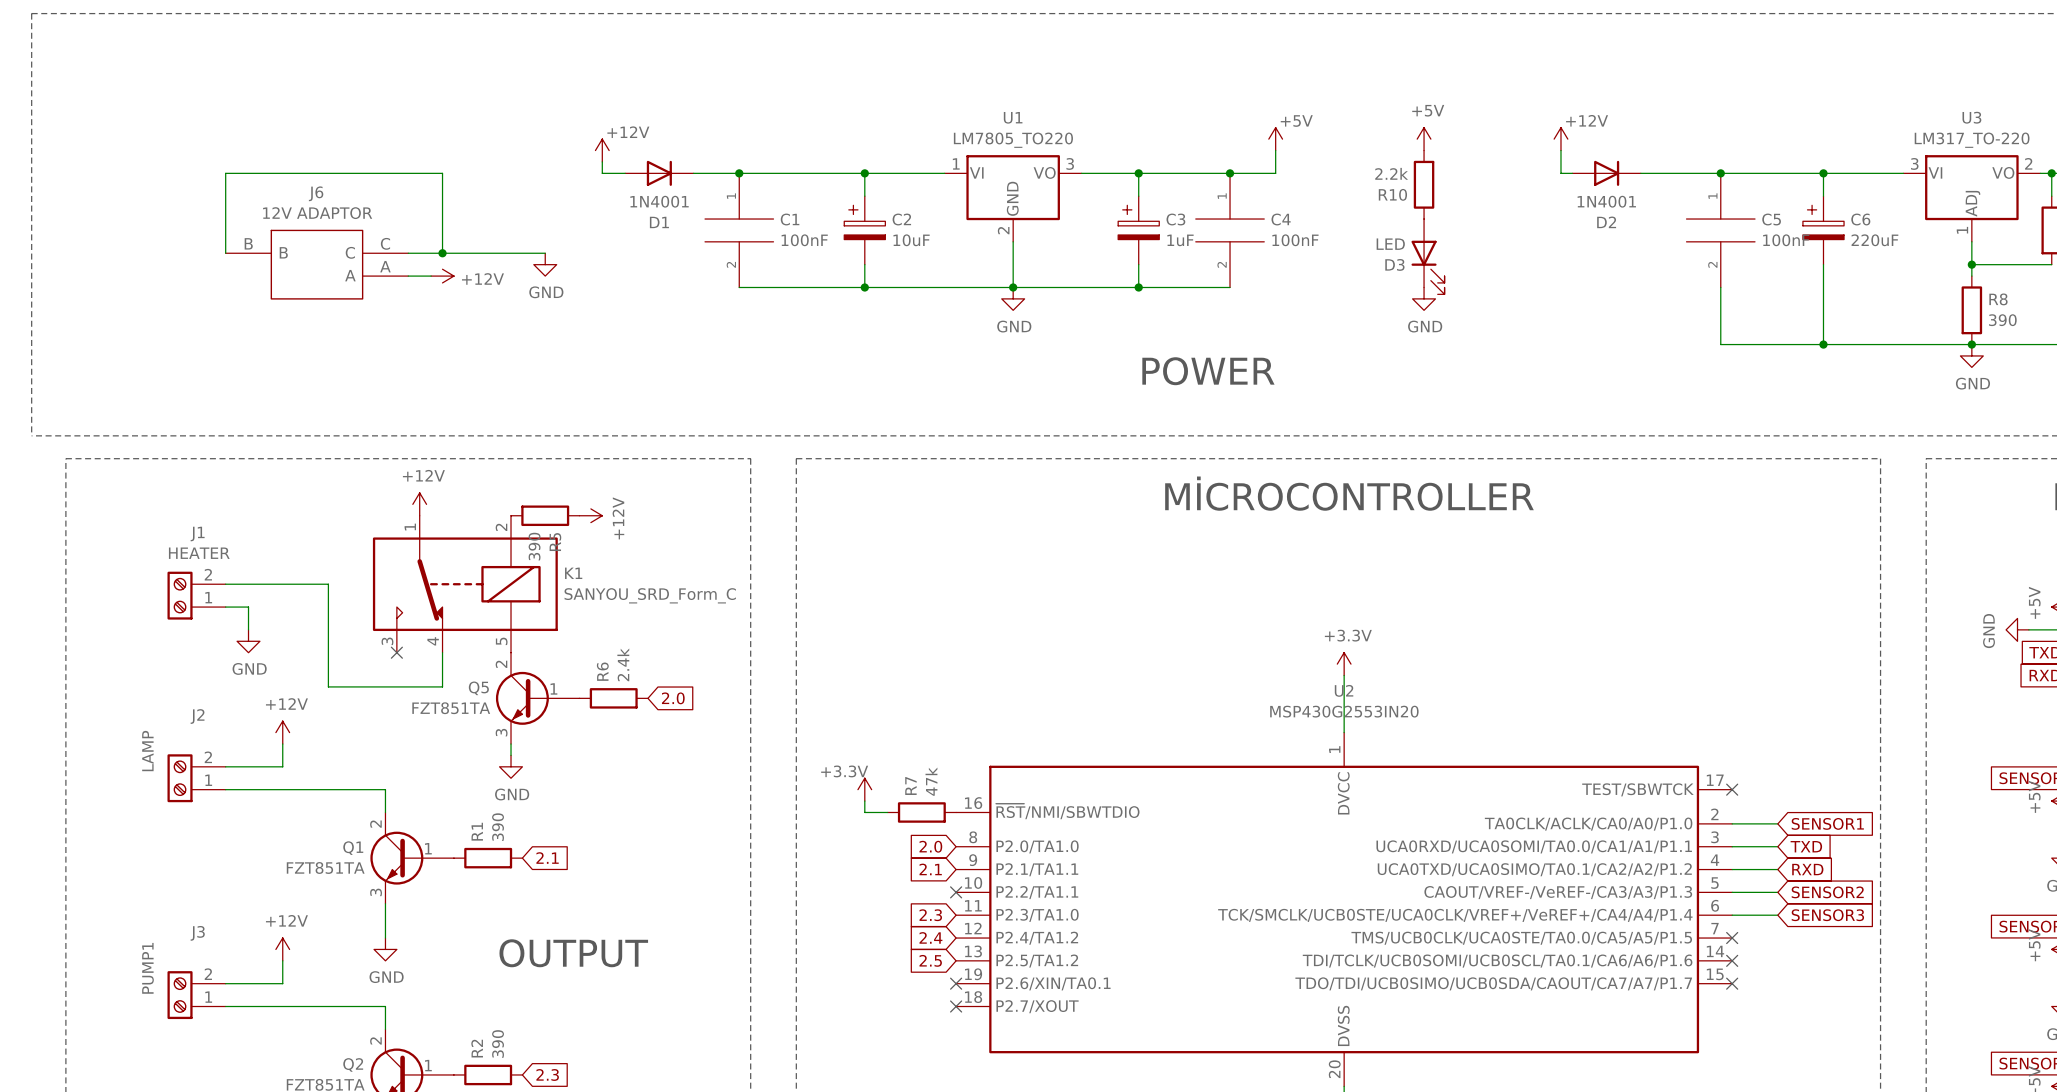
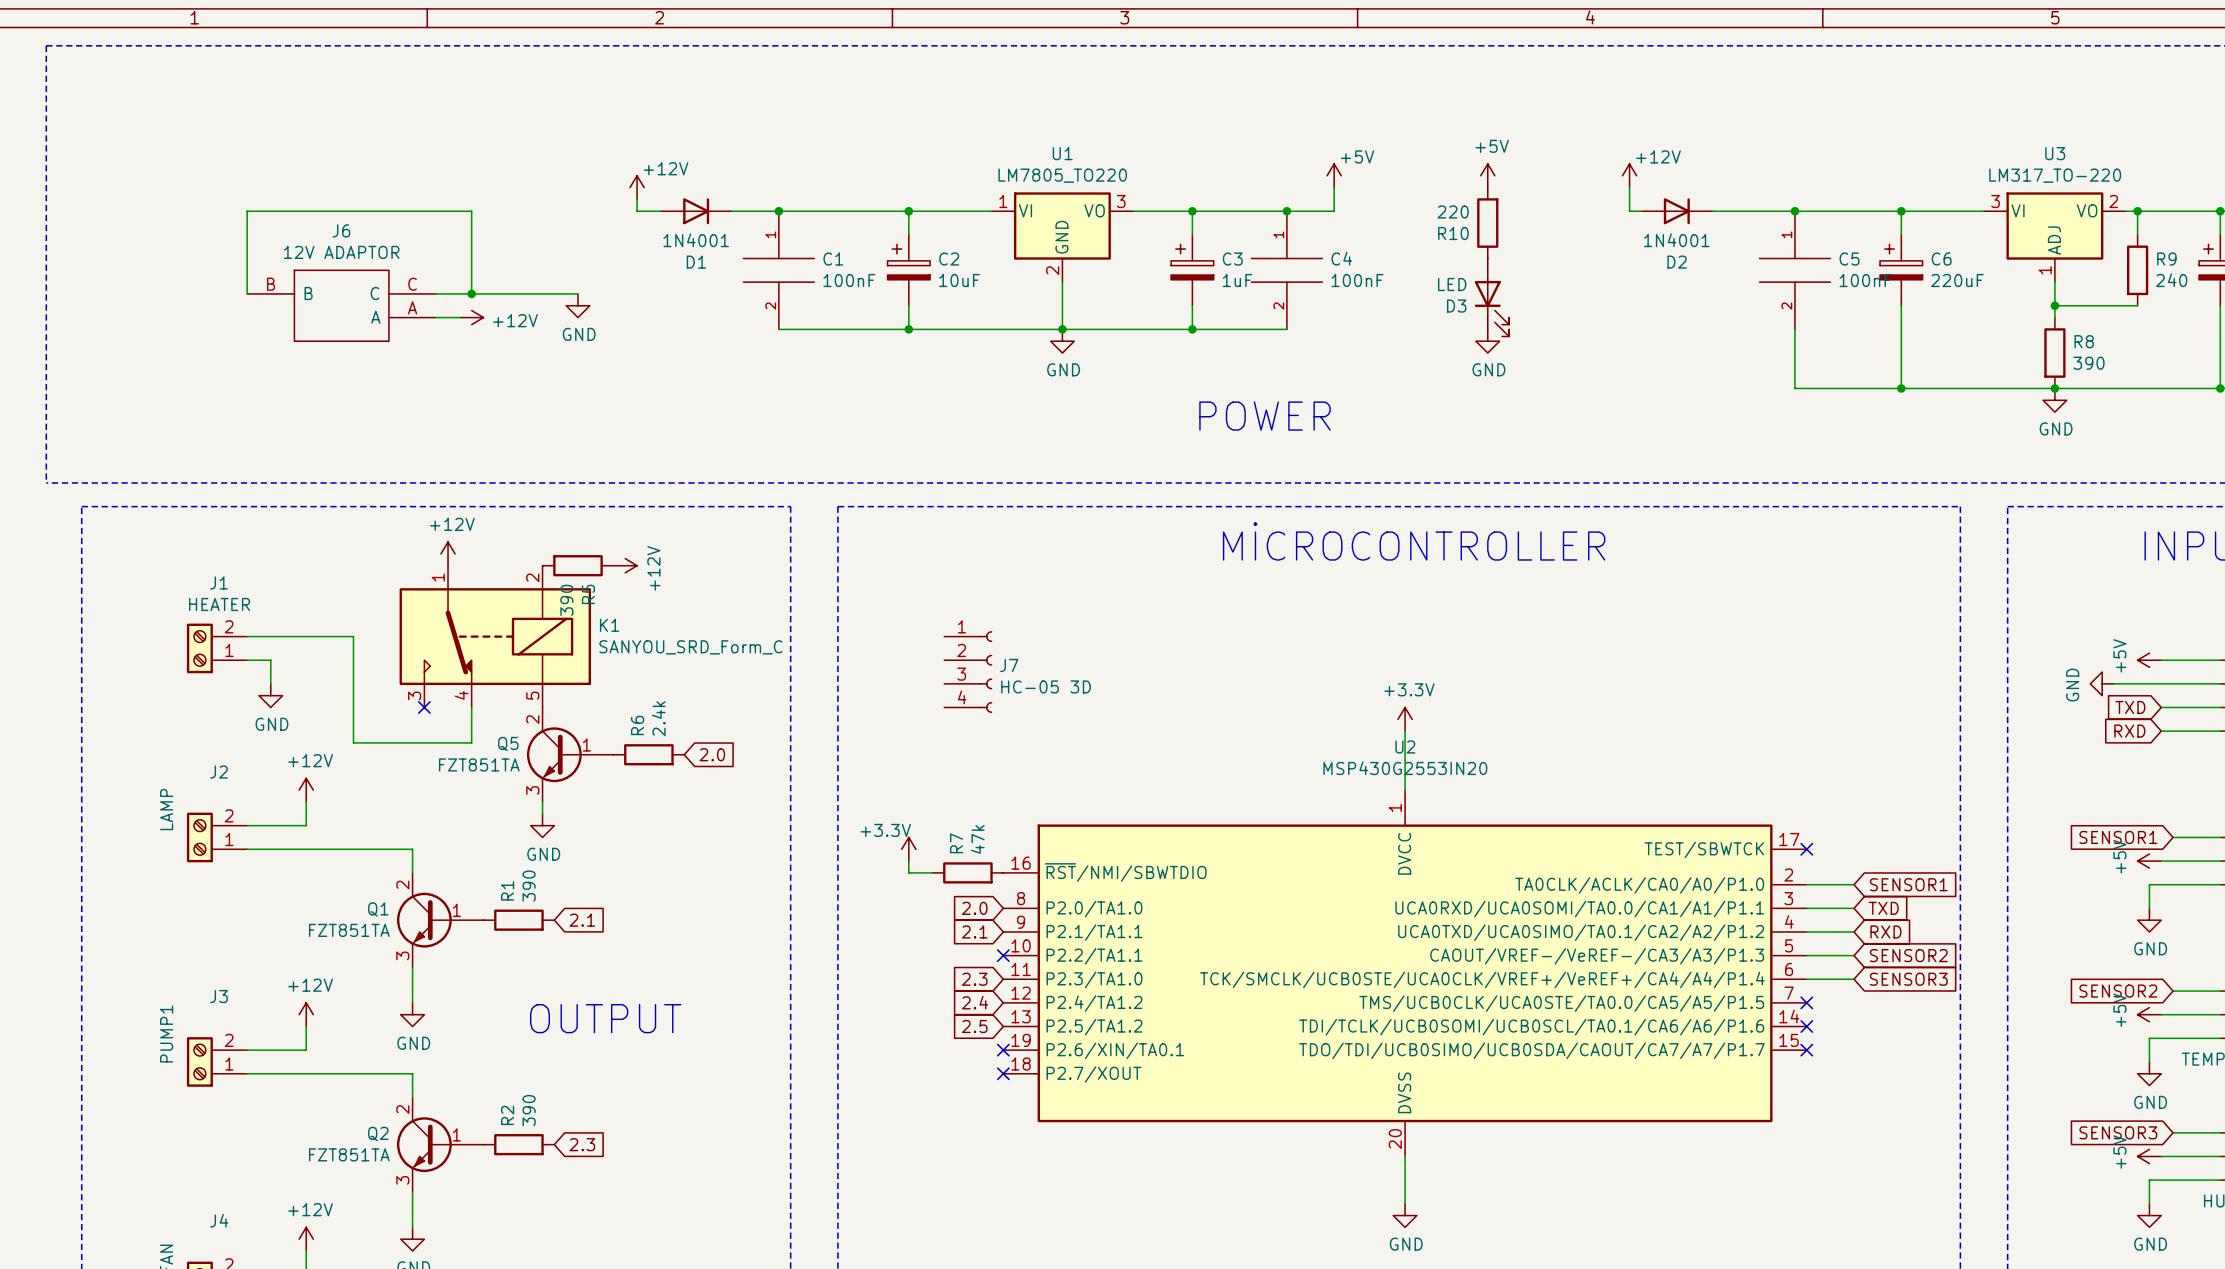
R10 value: 2.2k (1391, 173) -> 220 (1453, 211)
J7: none -> HC-05 3D (968, 672)

